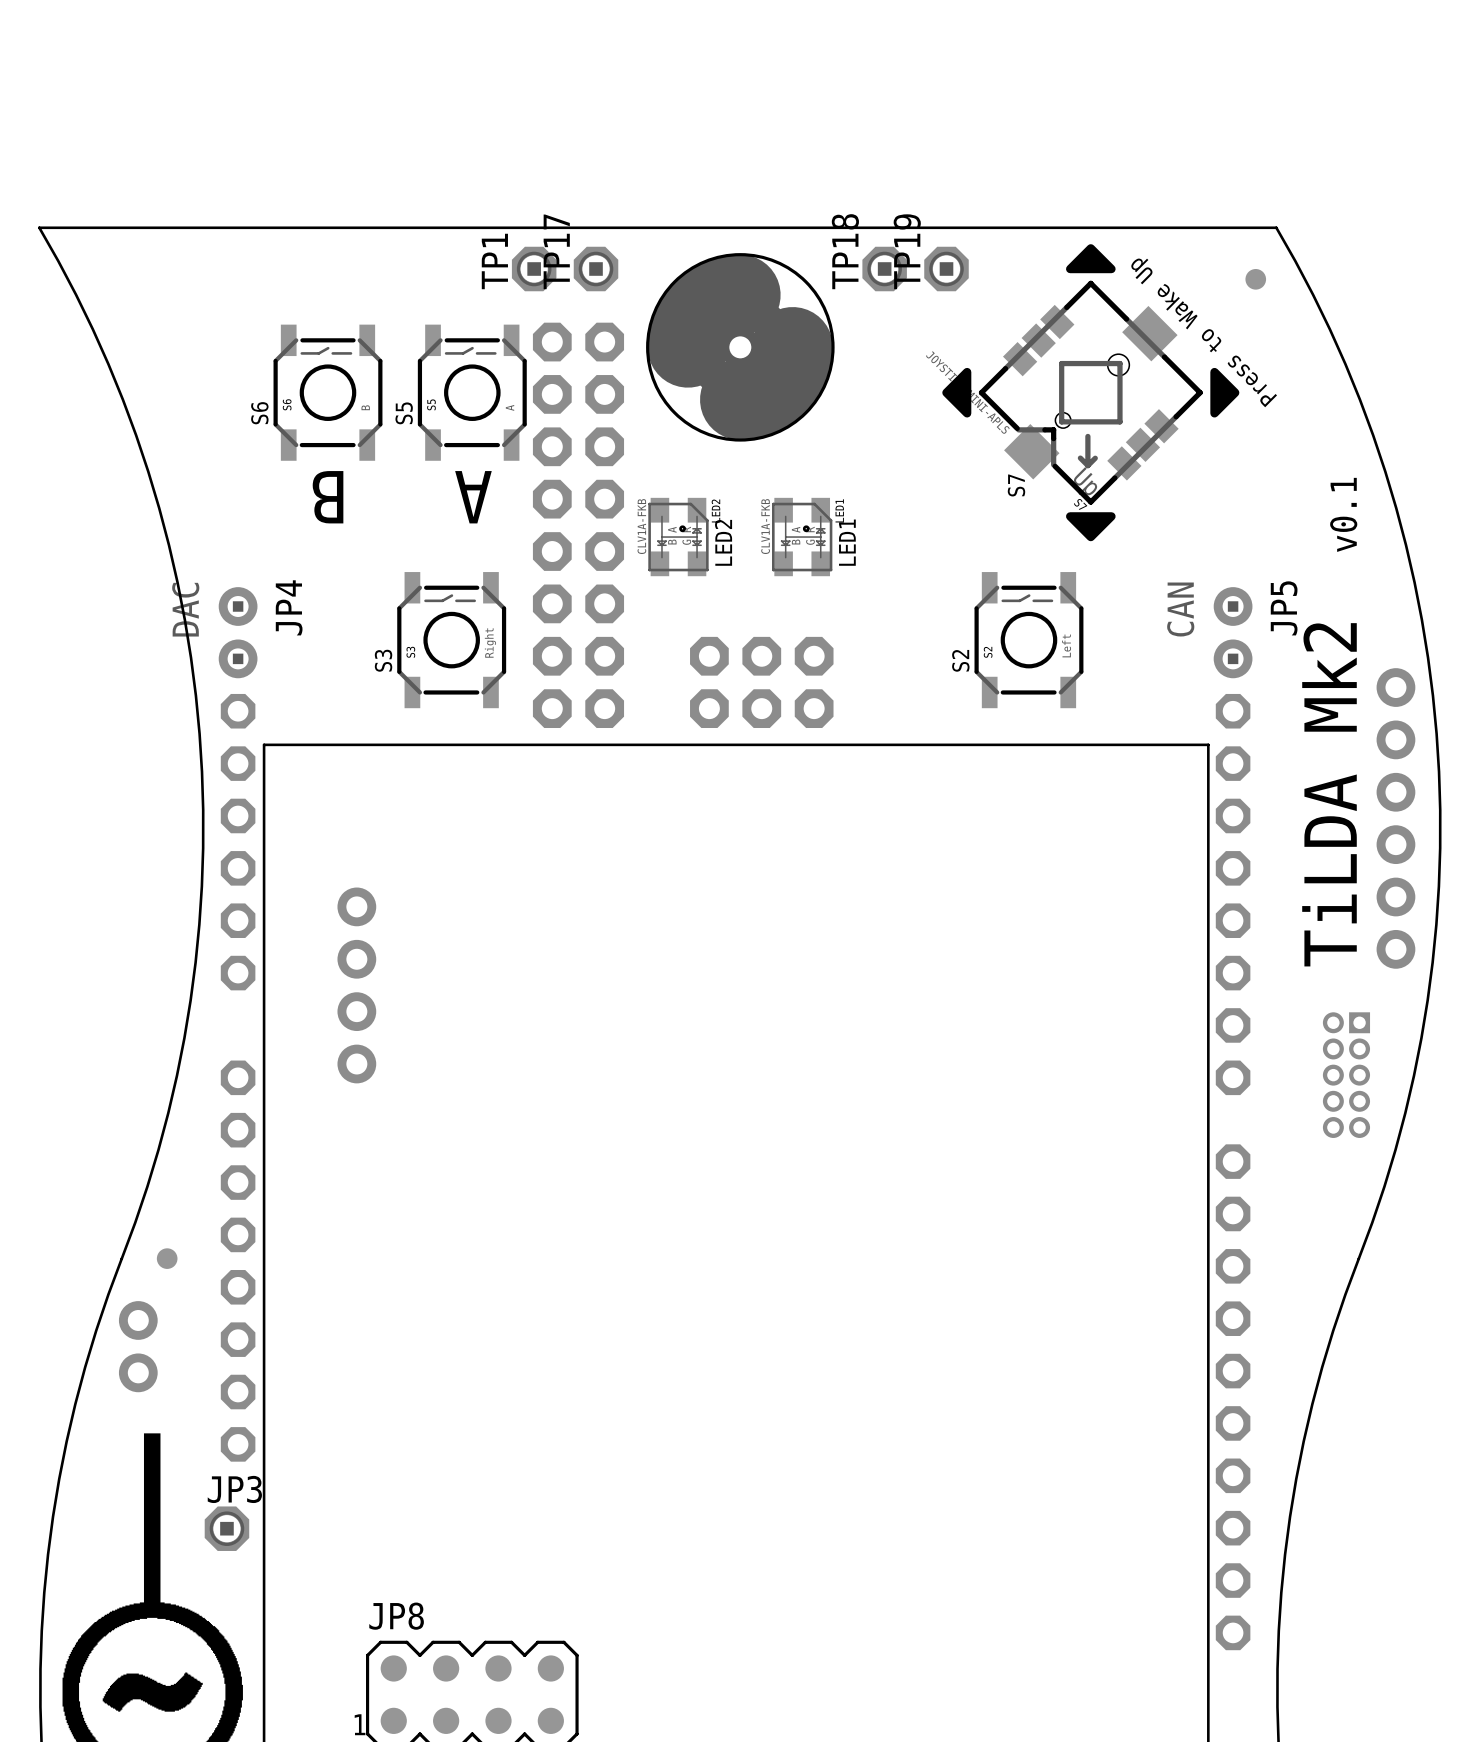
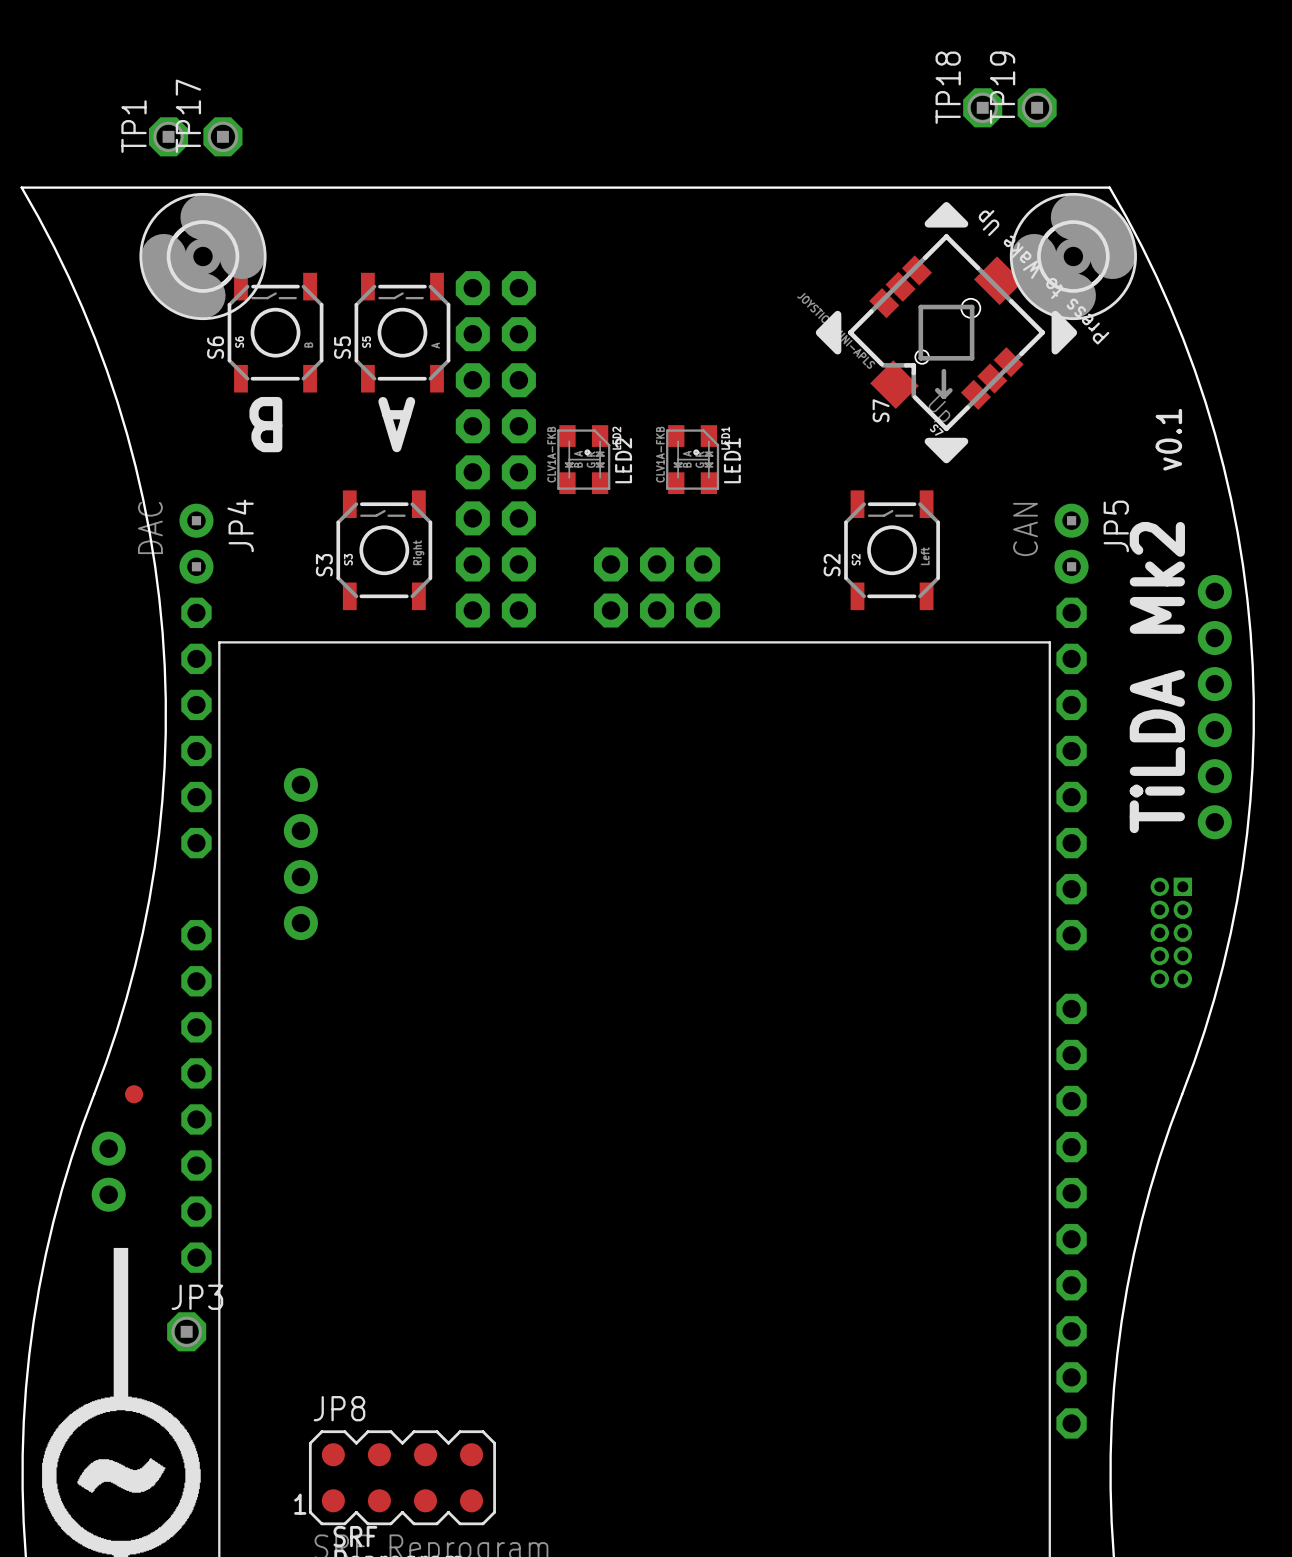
TP1 position: (534, 269) -> (168, 136)
TP17 position: (596, 269) -> (222, 136)
TP18 position: (884, 269) -> (982, 107)
TP19 position: (946, 269) -> (1037, 107)
part: none -> (202, 256)
part: none -> (1073, 256)
part: (740, 347) -> none

